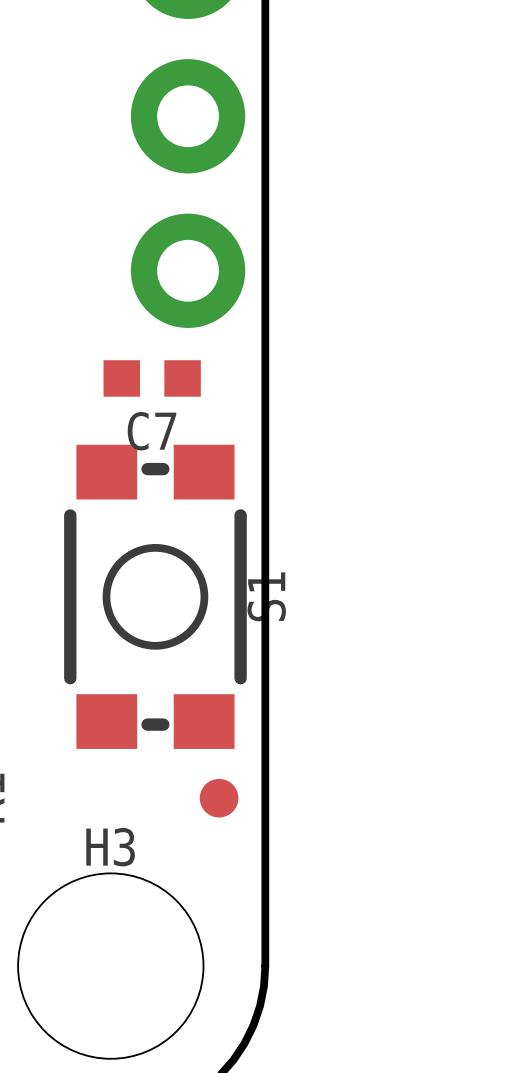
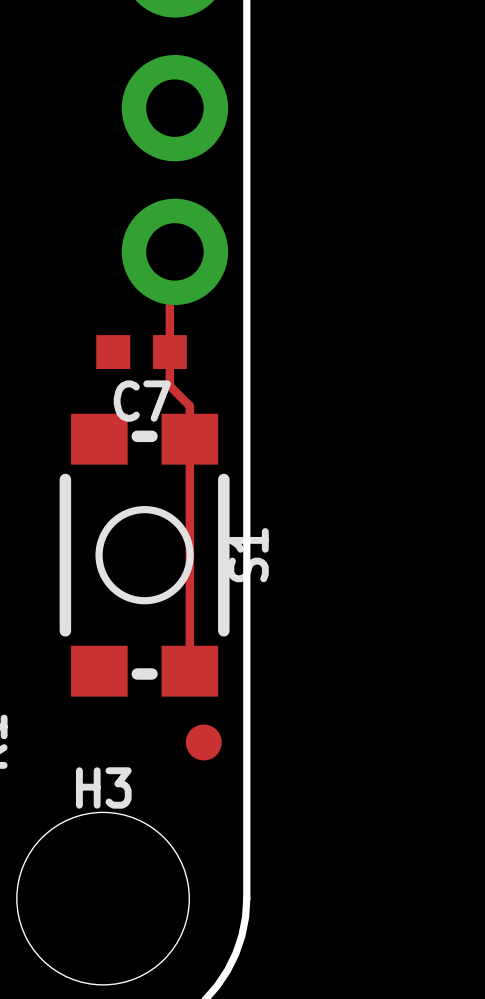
track: none -> (174, 251) (169, 256) (169, 385) (189, 406) (189, 671)

